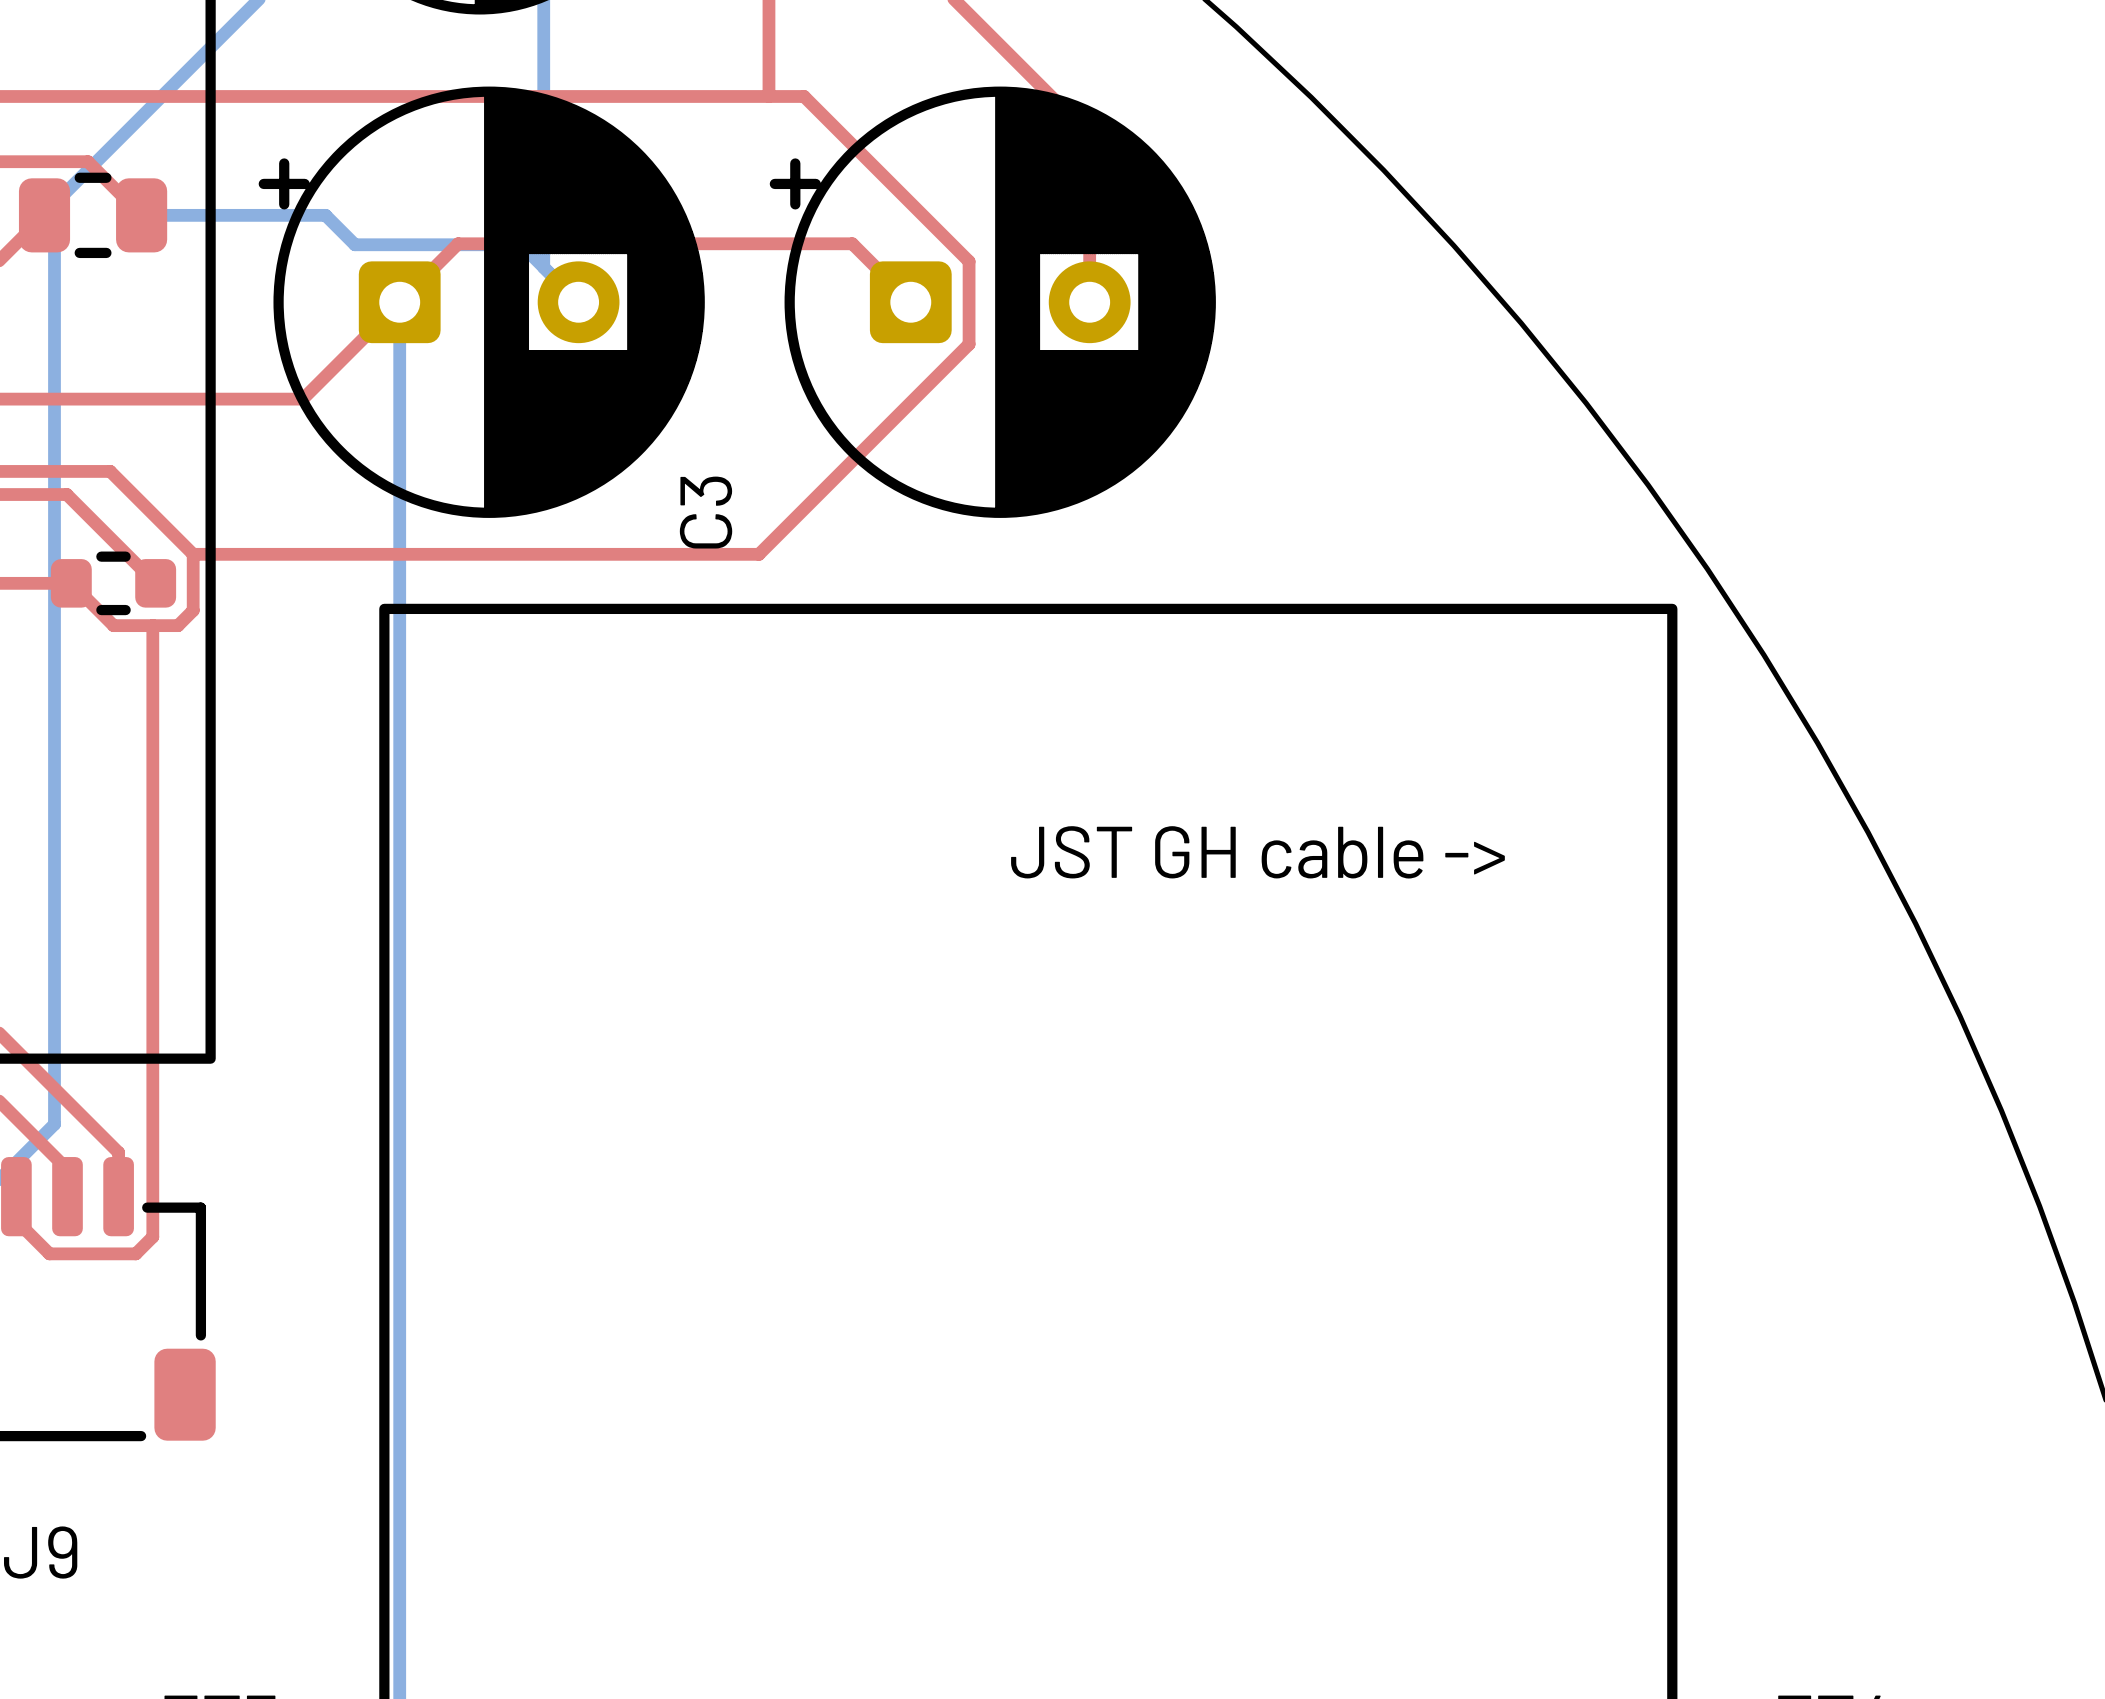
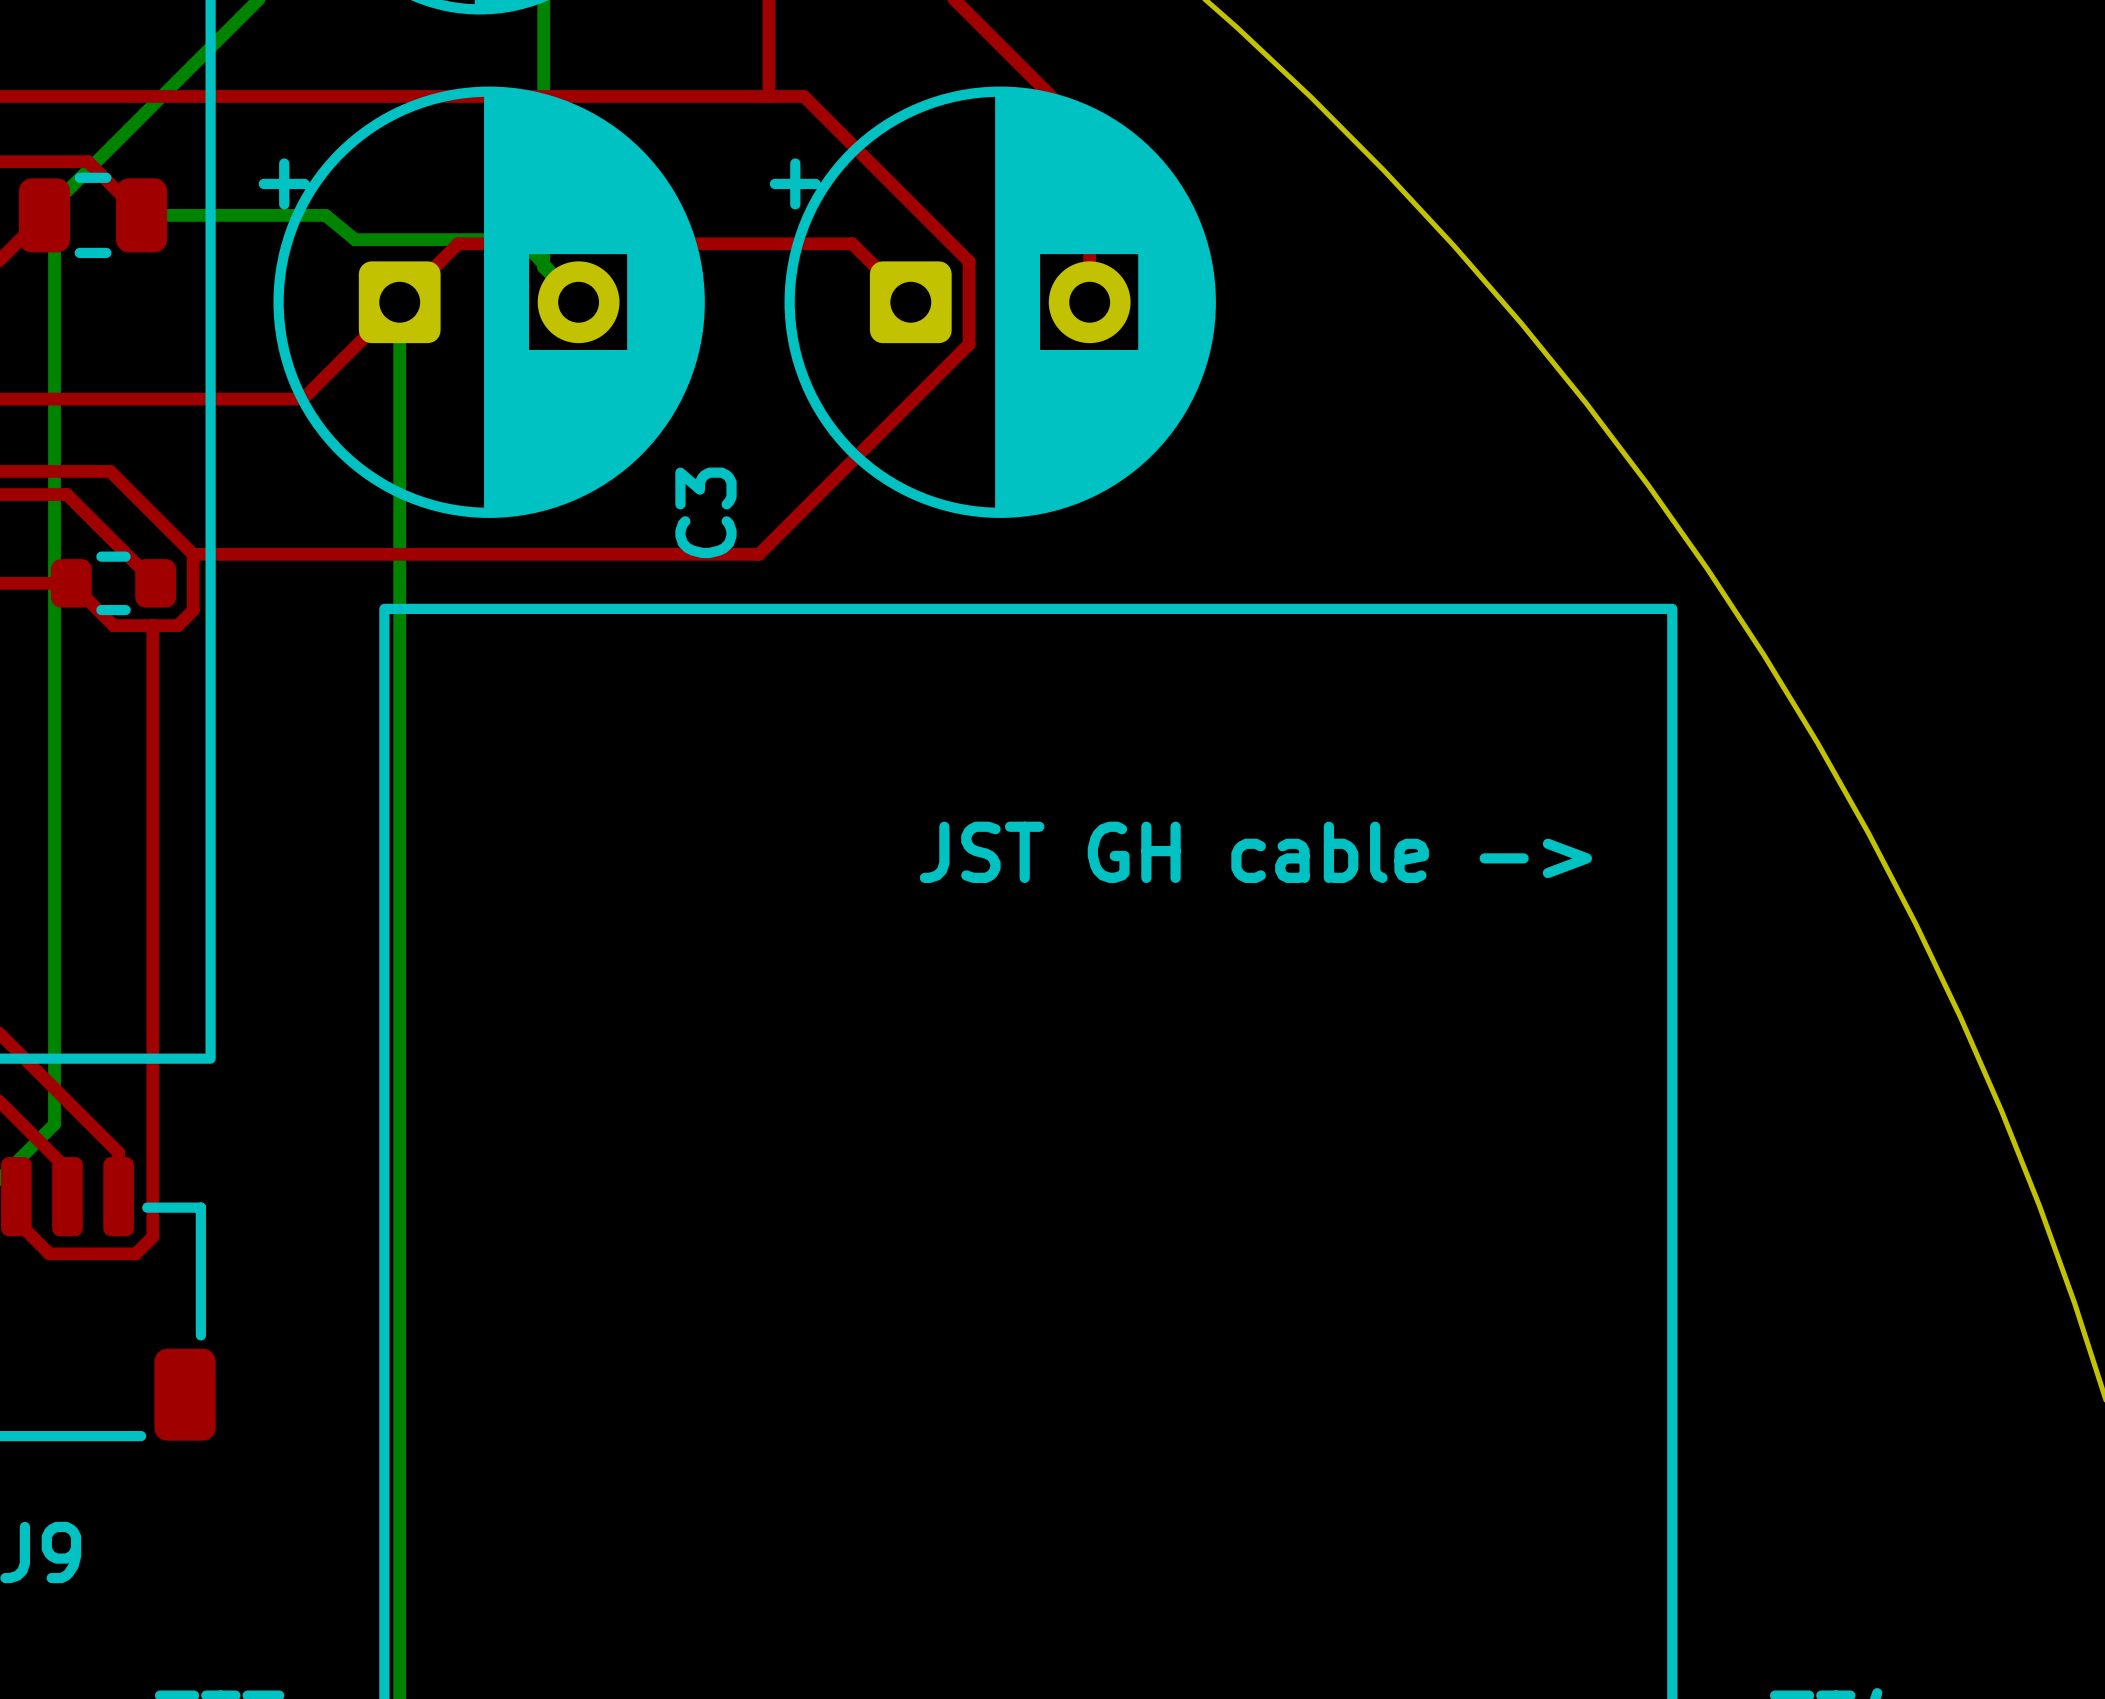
bottom track: (325, 215) (354, 244) (521, 244) (543, 267) -> (325, 215) (354, 239) (521, 239) (578, 302)

